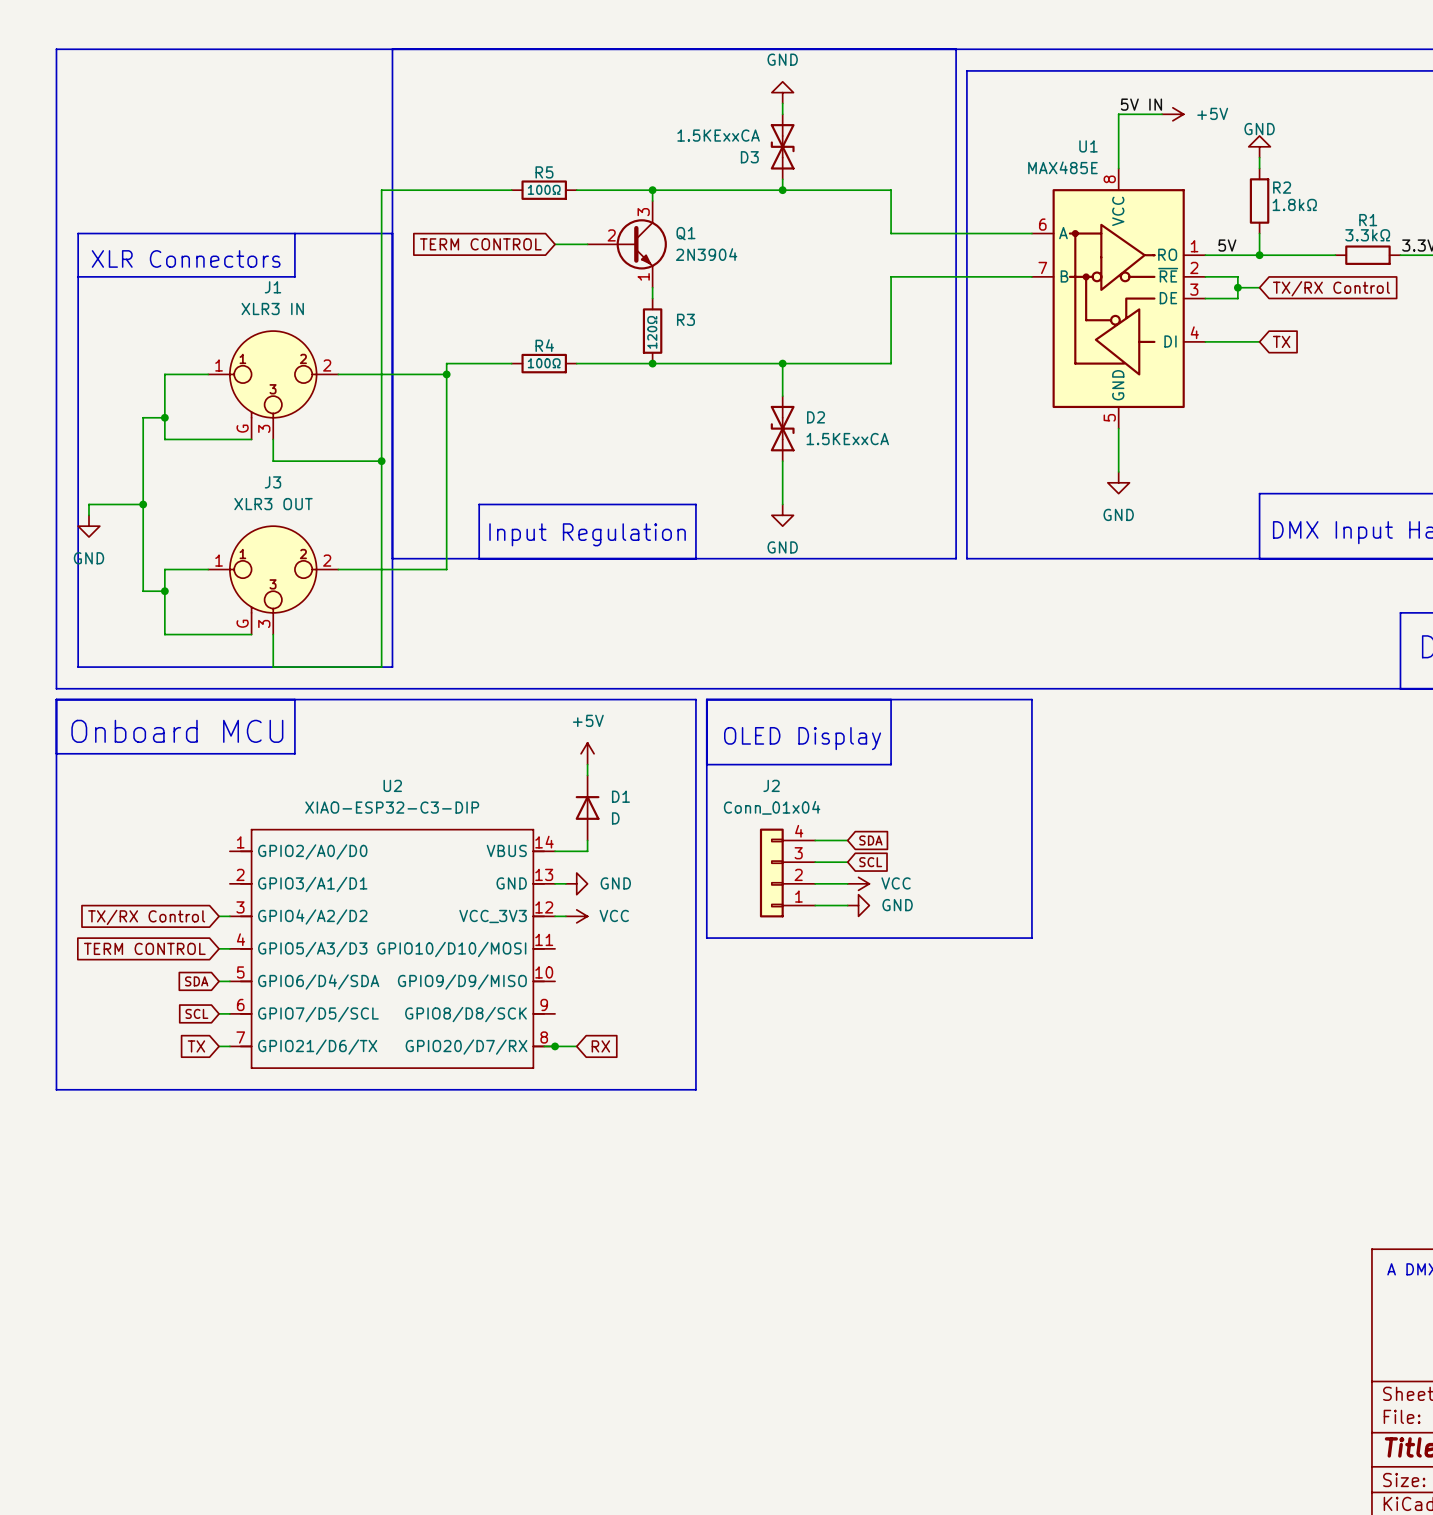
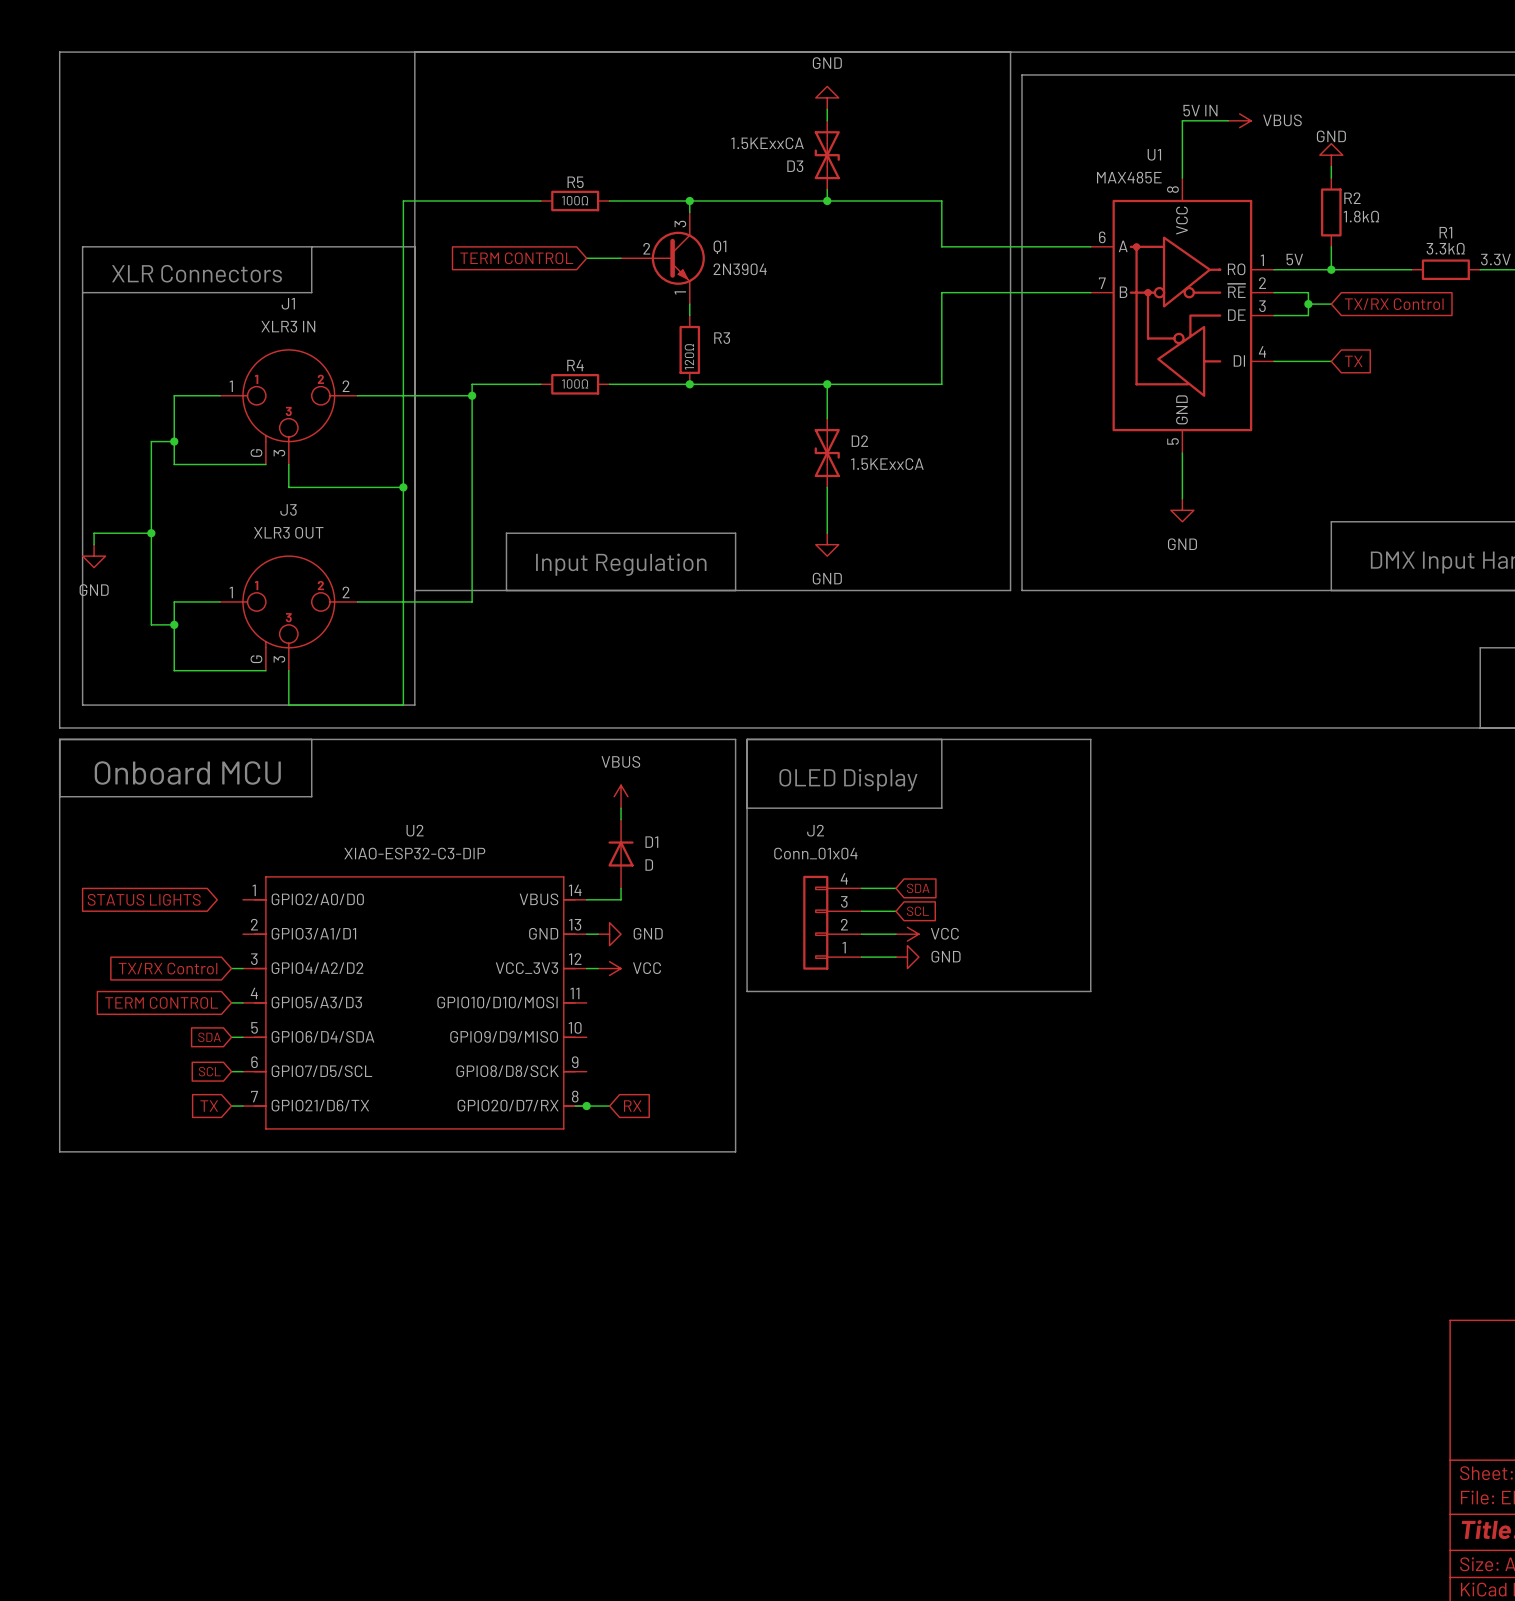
power symbol: +5V (1172, 114) -> VBUS (1239, 120)
power symbol: +5V (587, 753) -> VBUS (621, 796)
global label: none -> STATUS LIGHTS (144, 899)

